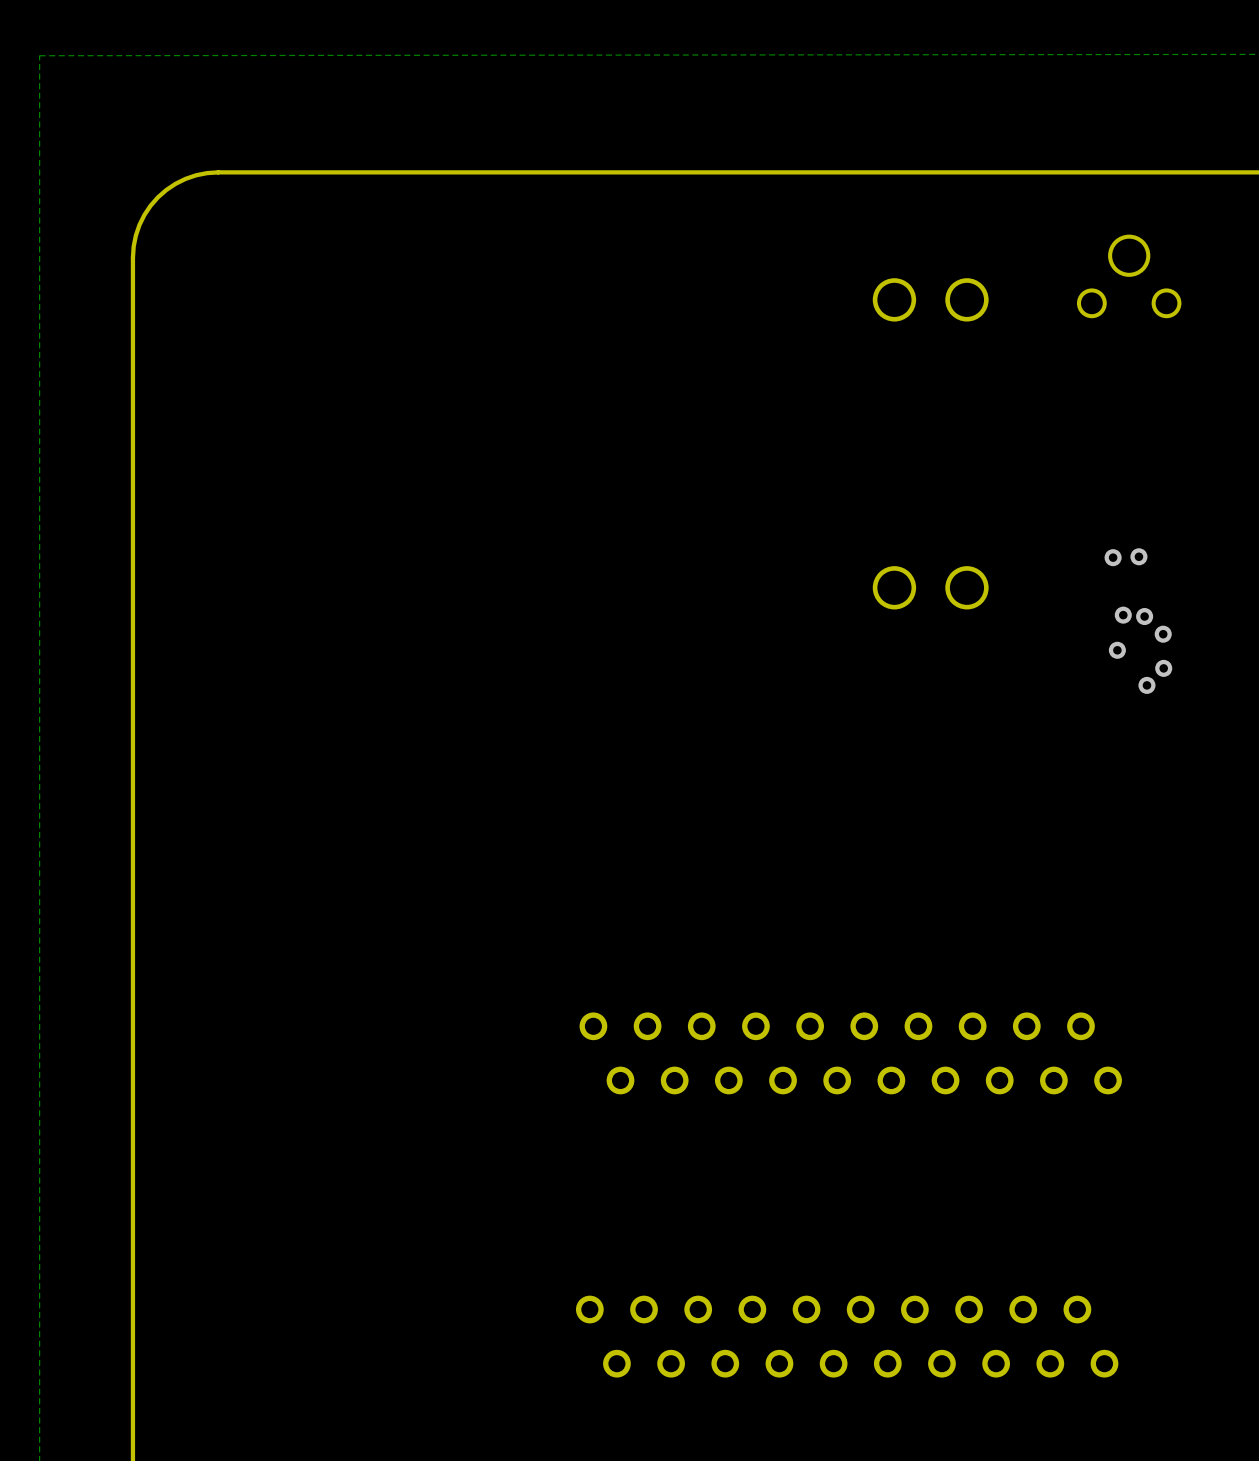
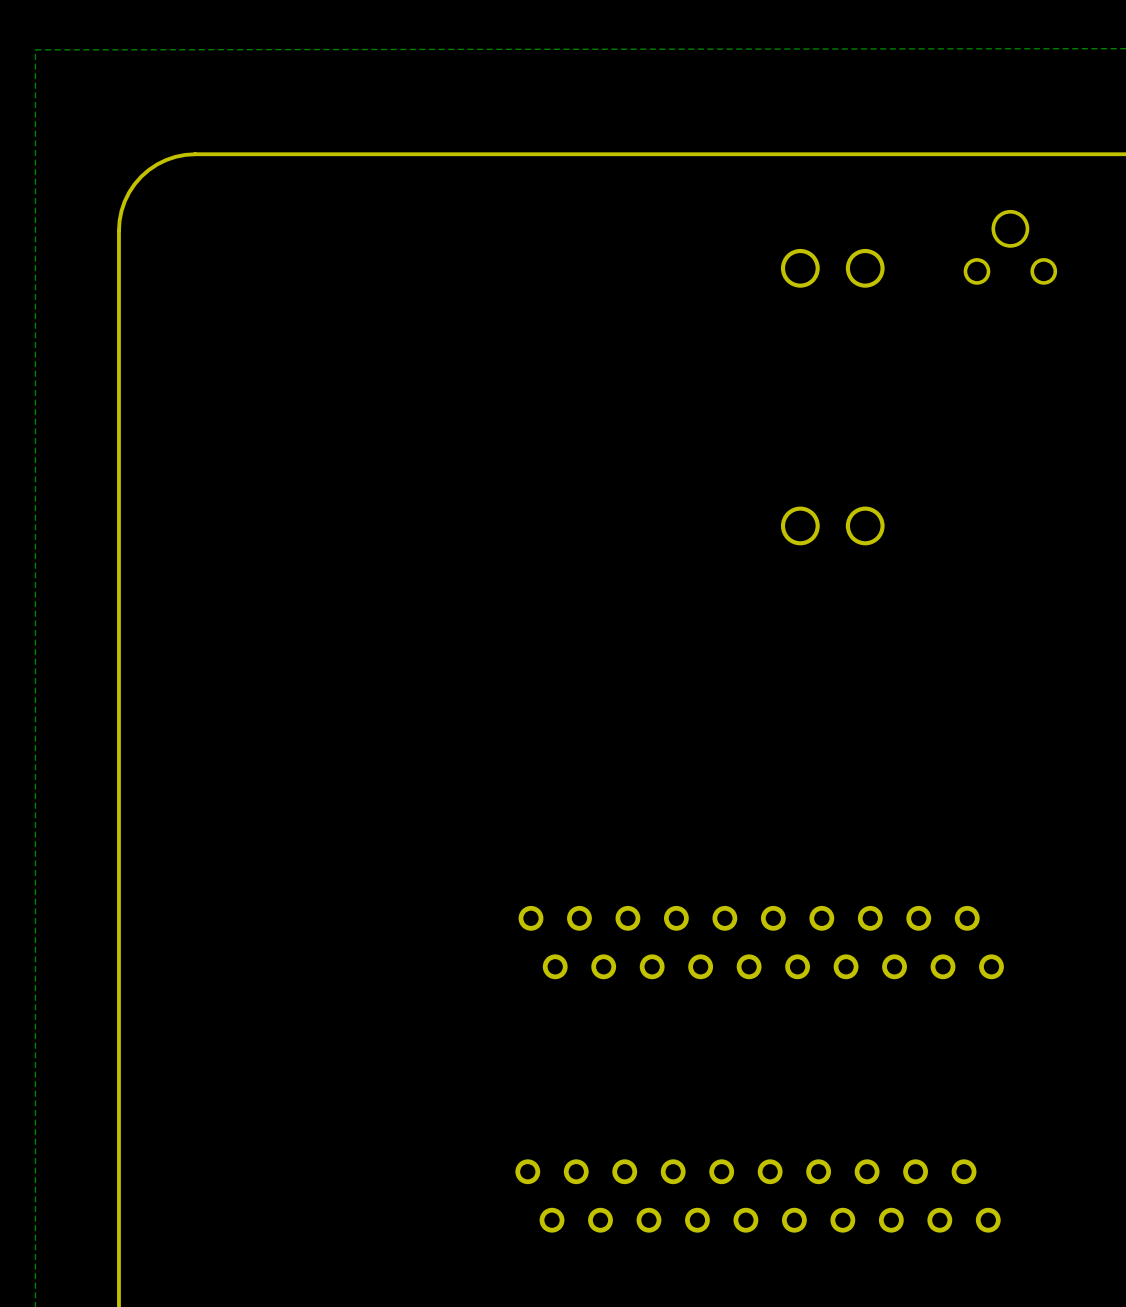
via: (1138, 556) -> none
via: (1113, 557) -> none
via: (1123, 615) -> none
via: (1144, 616) -> none
via: (1163, 634) -> none
via: (1117, 650) -> none
via: (1163, 668) -> none
via: (1146, 685) -> none

